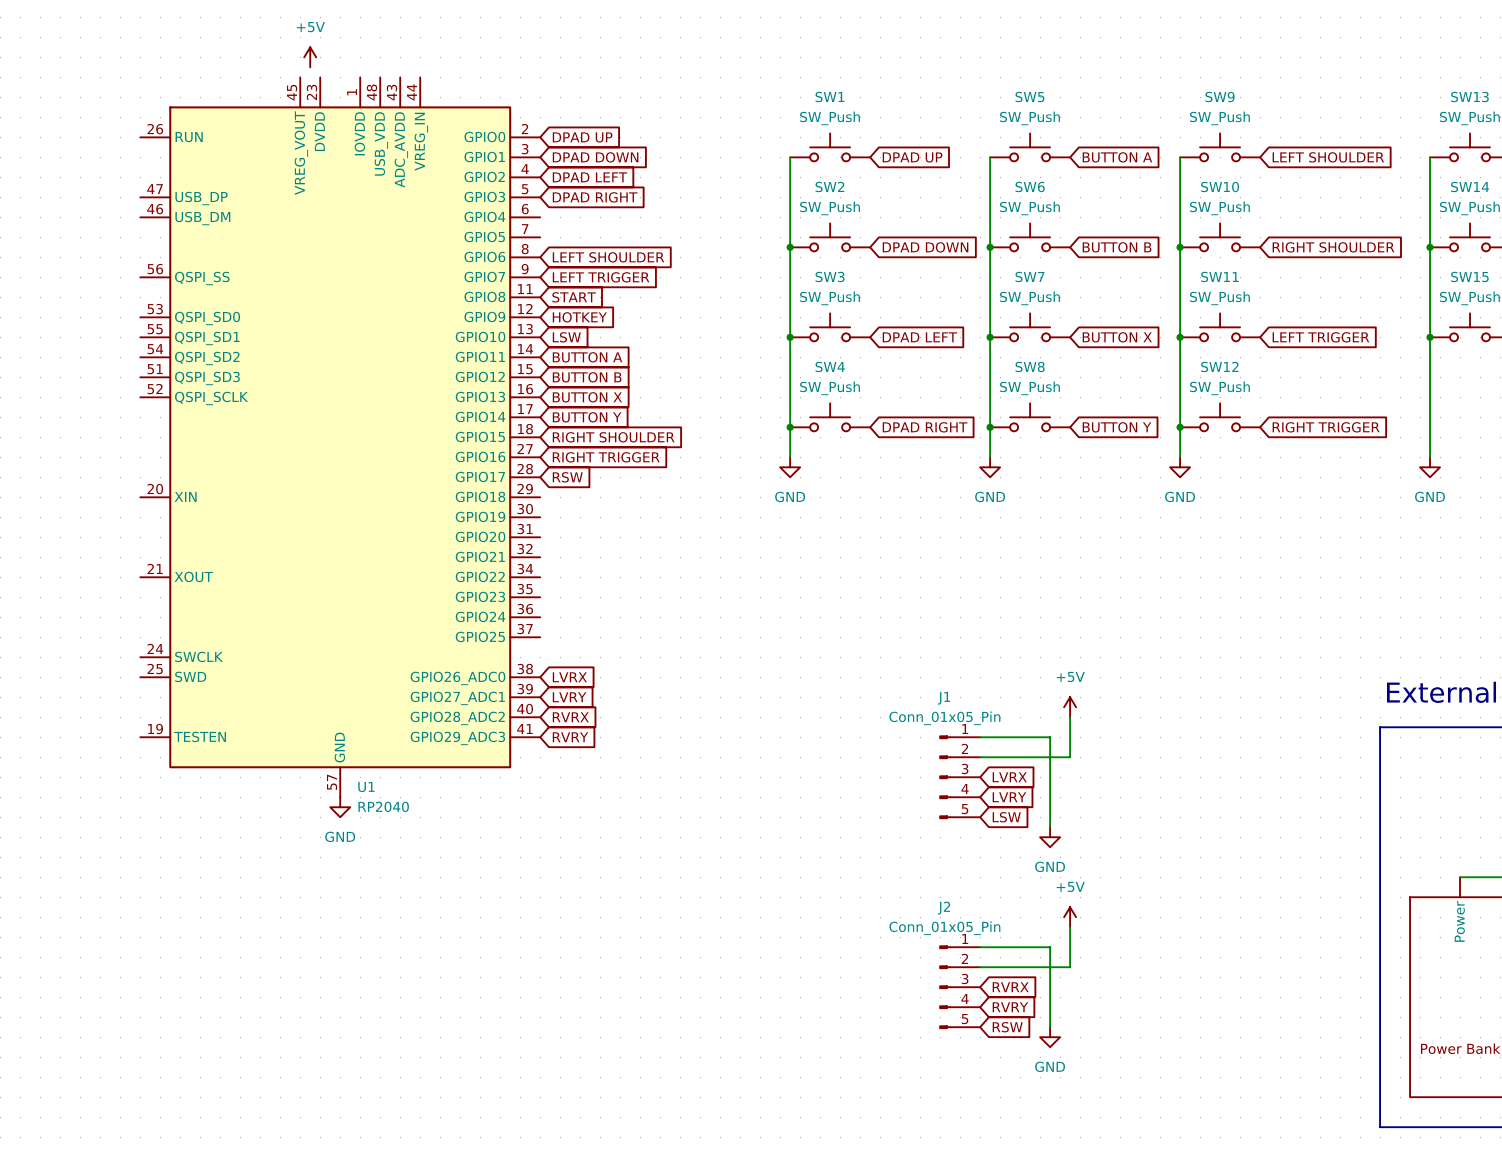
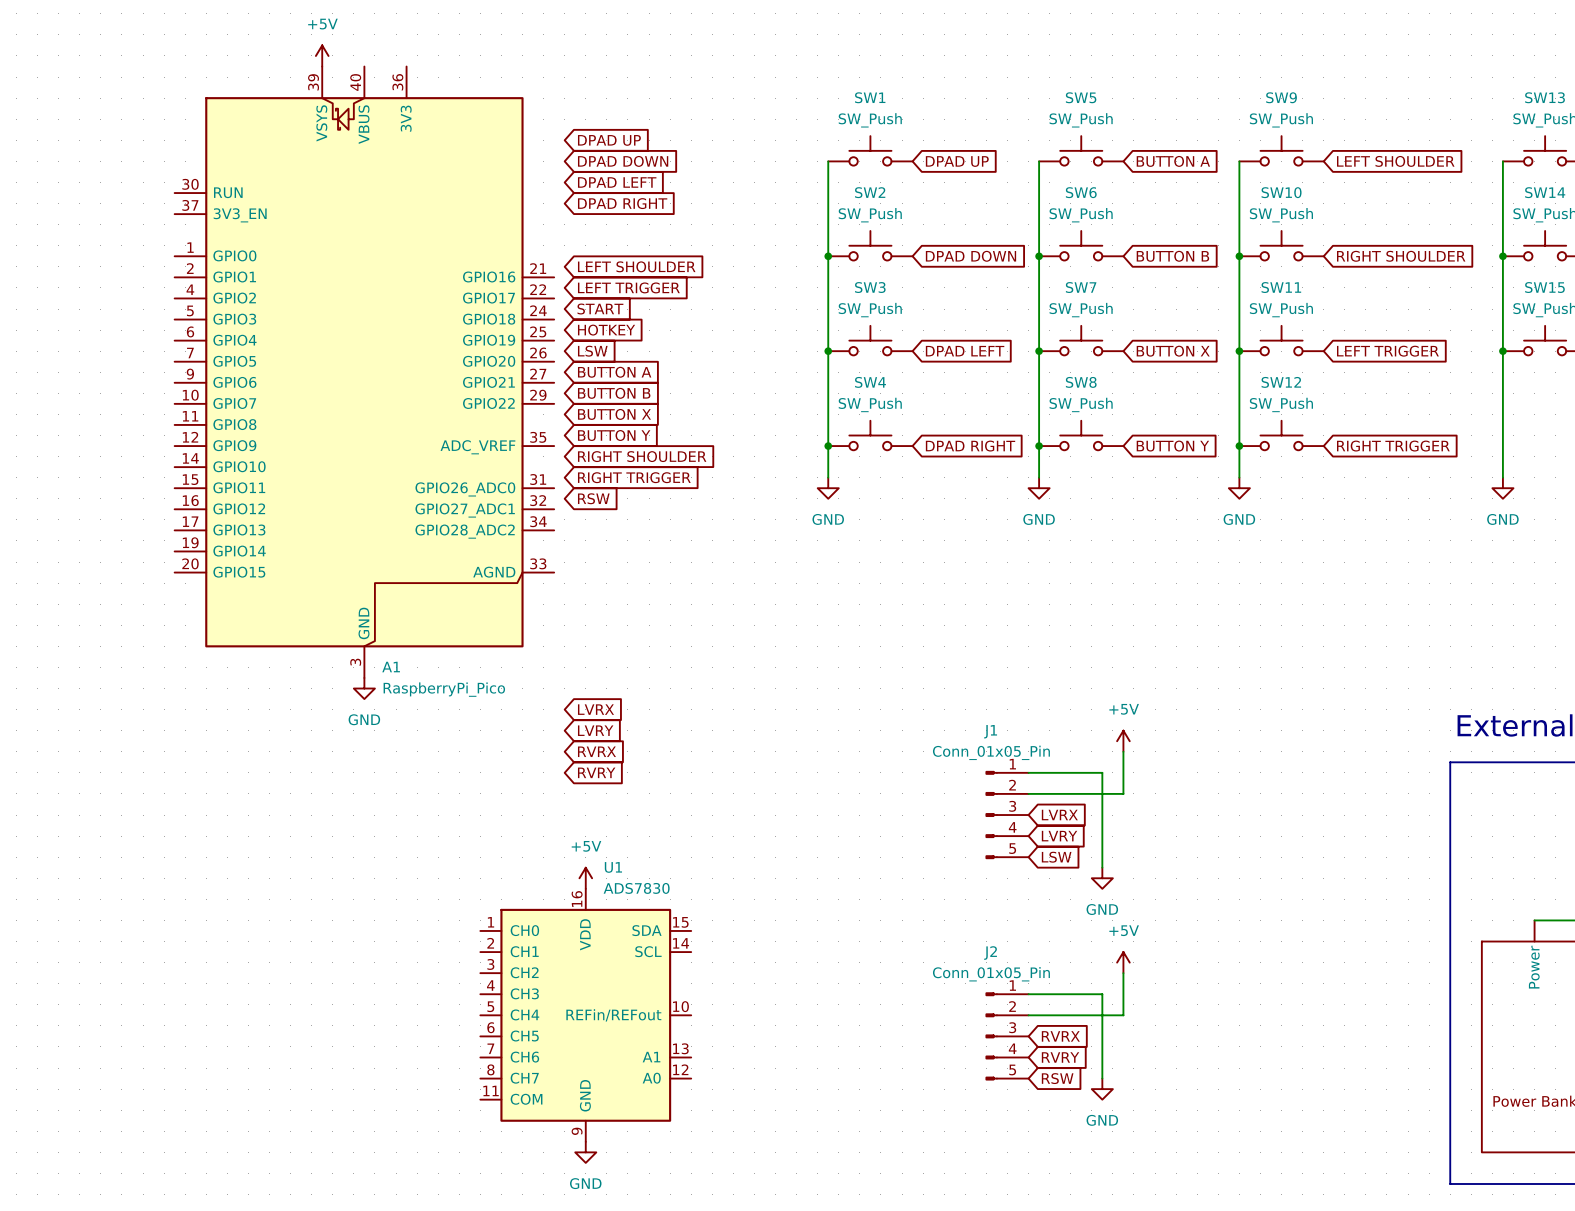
U1 symbol: [140, 77, 541, 798] -> [480, 888, 692, 1142]
A1: none -> RaspberryPi_Pico (364, 372)
U1 name position: U1 (366, 786) -> U1 (613, 867)
U1 value: RP2040 (383, 806) -> ADS7830 (636, 888)
power symbol position: GND (340, 807) -> GND (364, 688)
power symbol: none -> +5V (585, 878)
power symbol: none -> GND (585, 1152)

